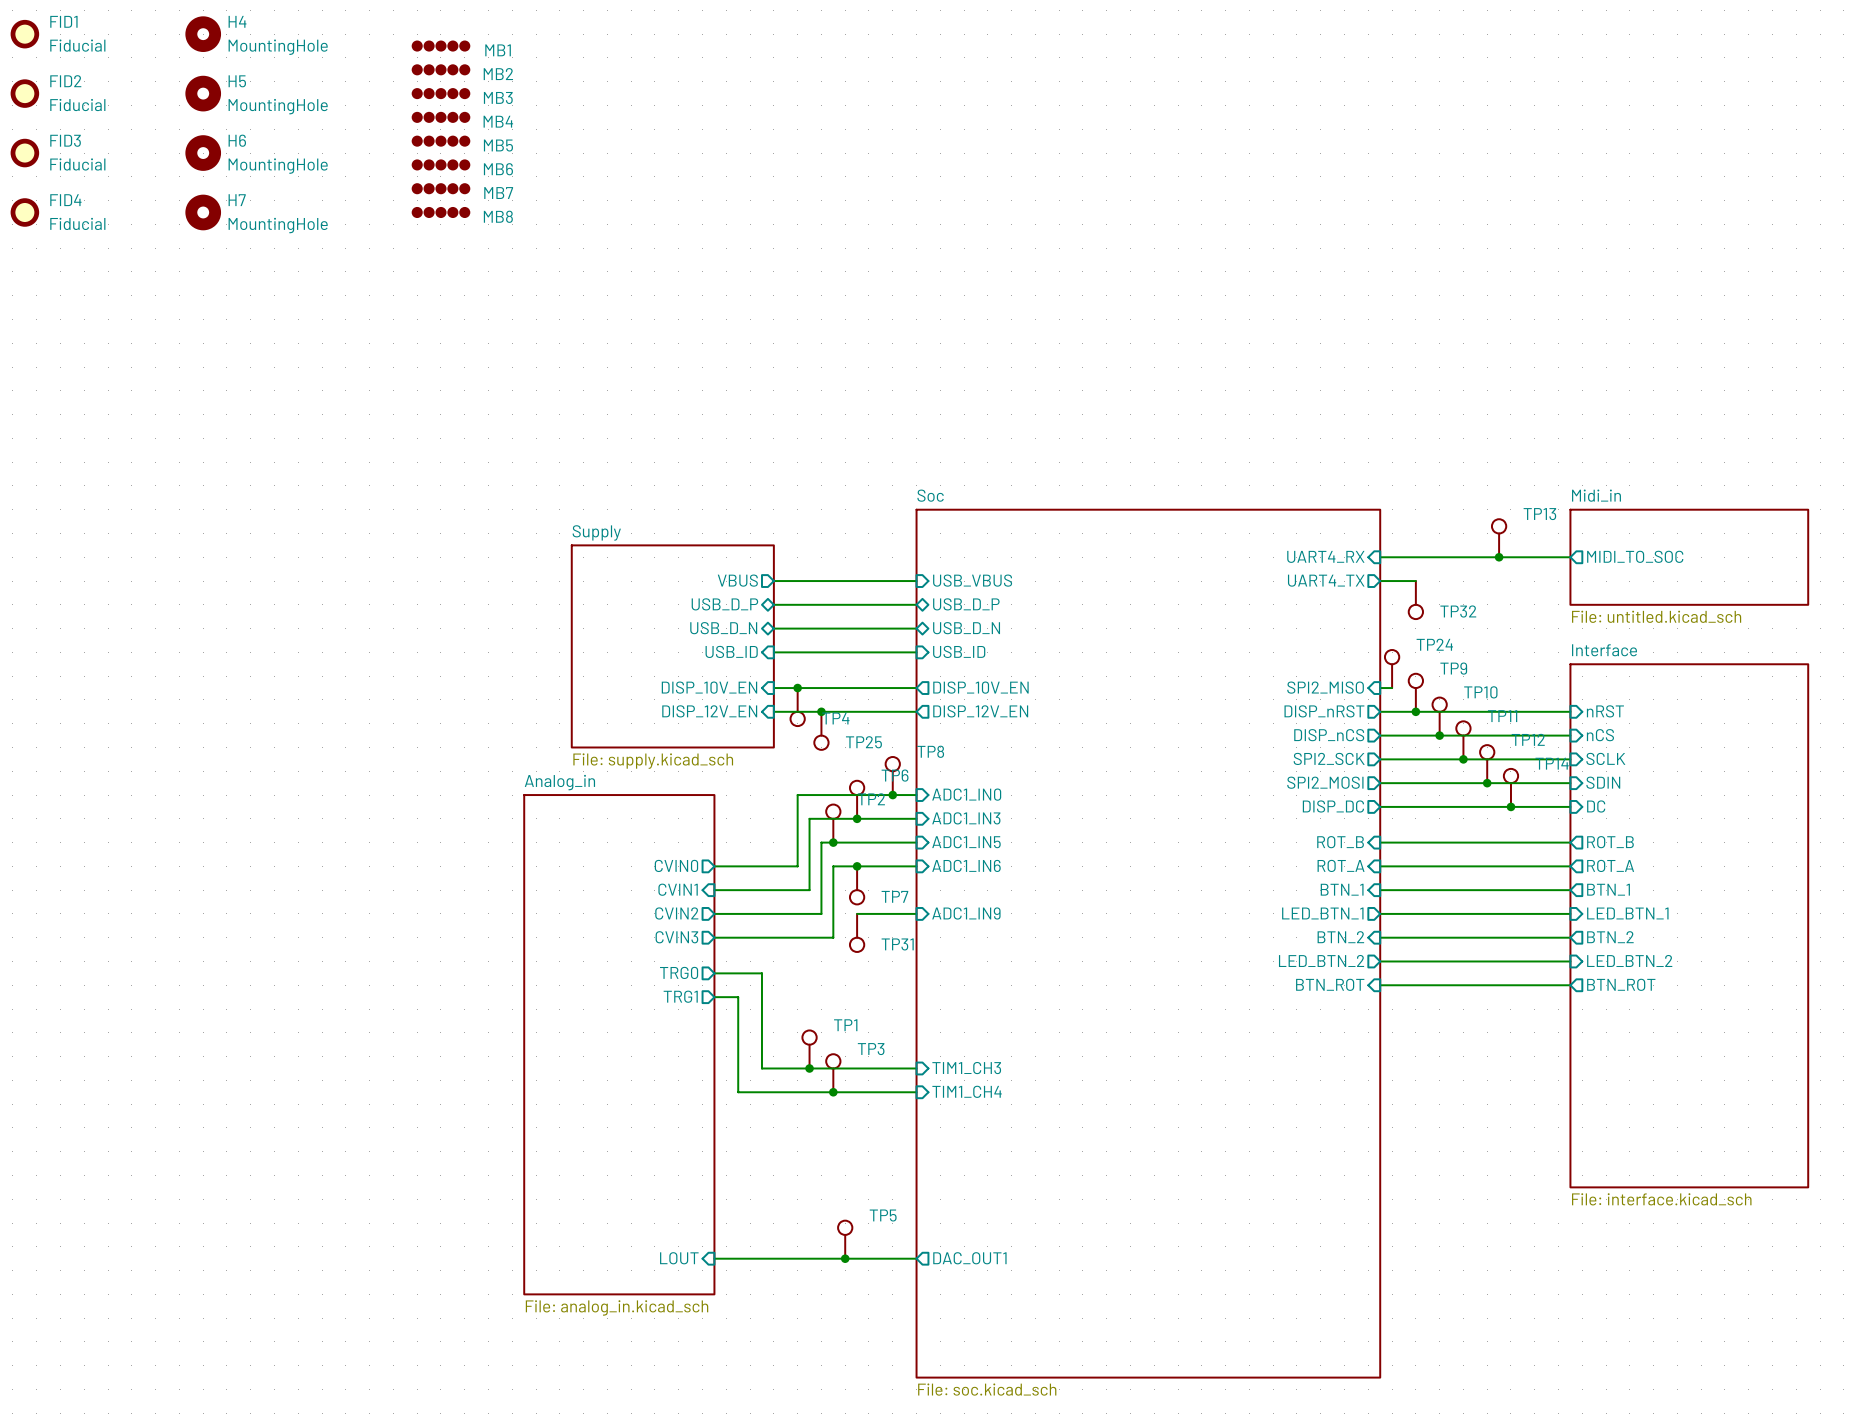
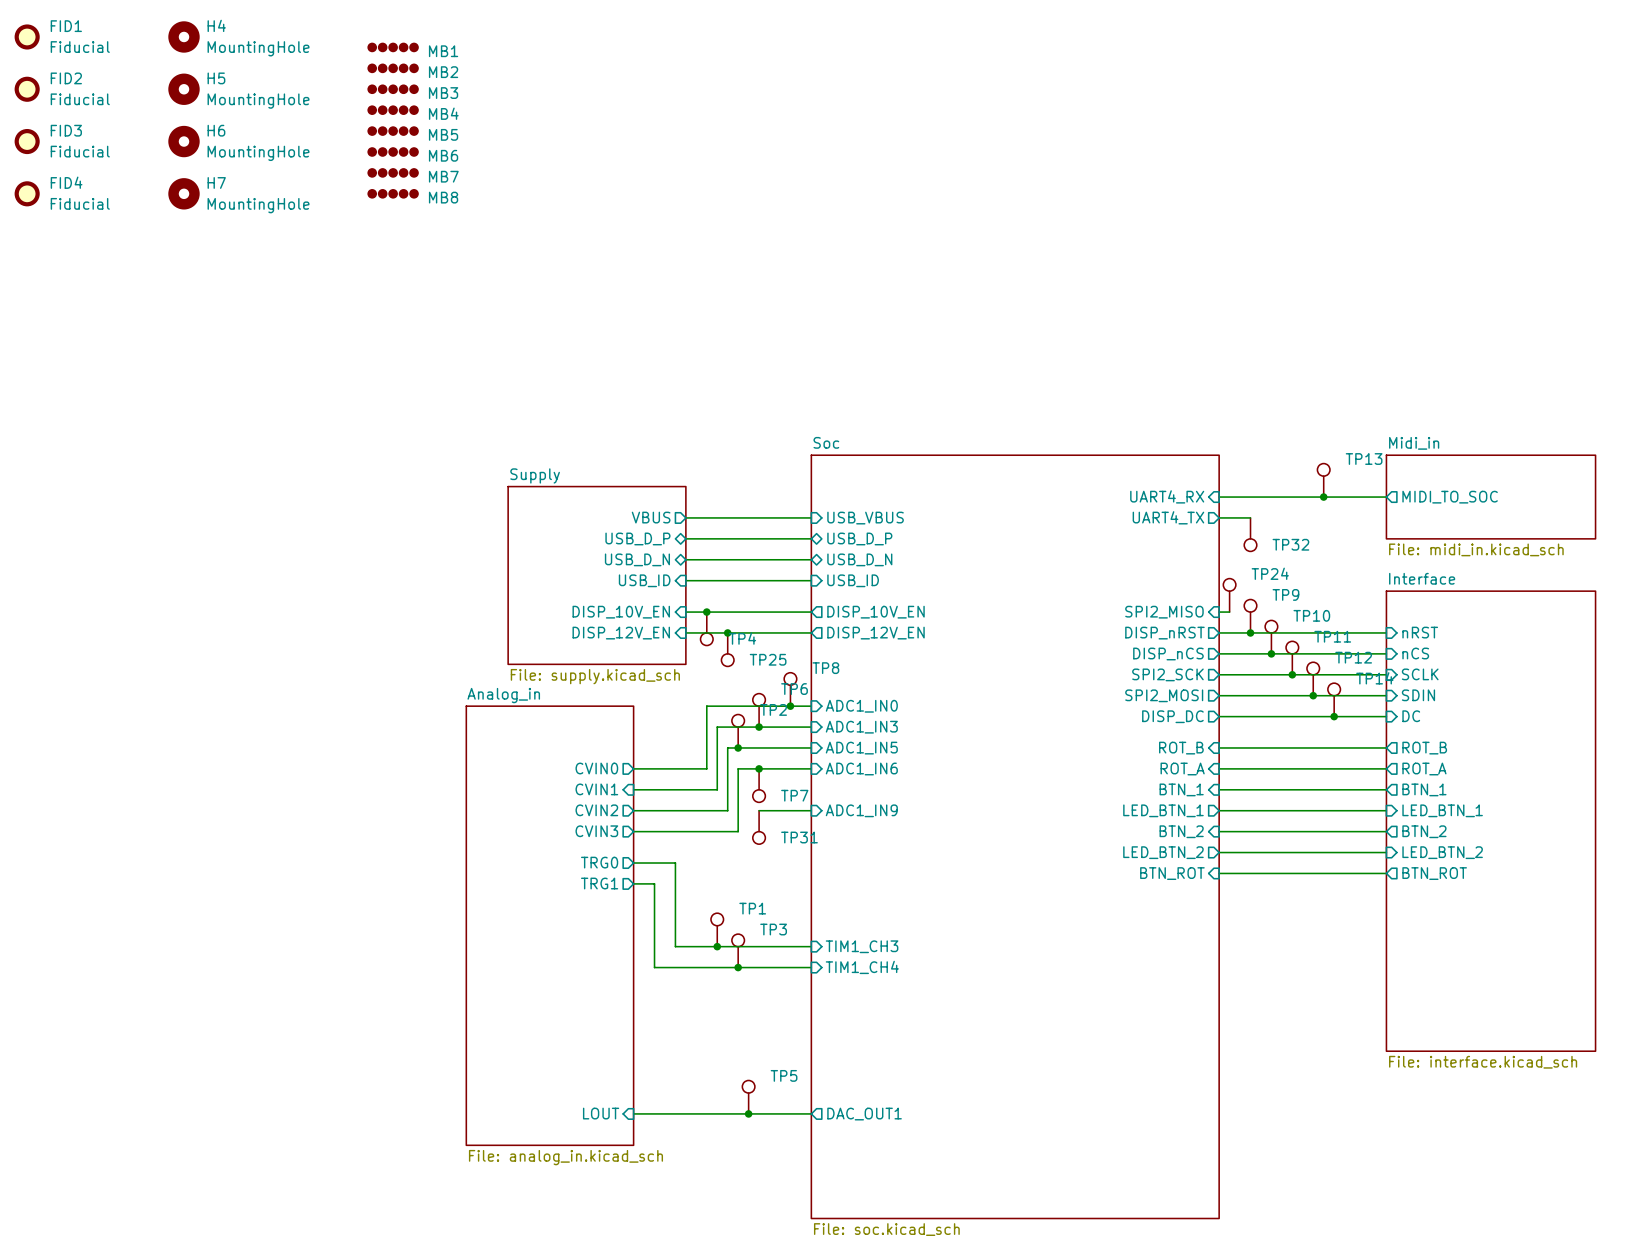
sheet Midi_in value: File: untitled.kicad_sch (1656, 616) -> File: midi_in.kicad_sch (1476, 549)

